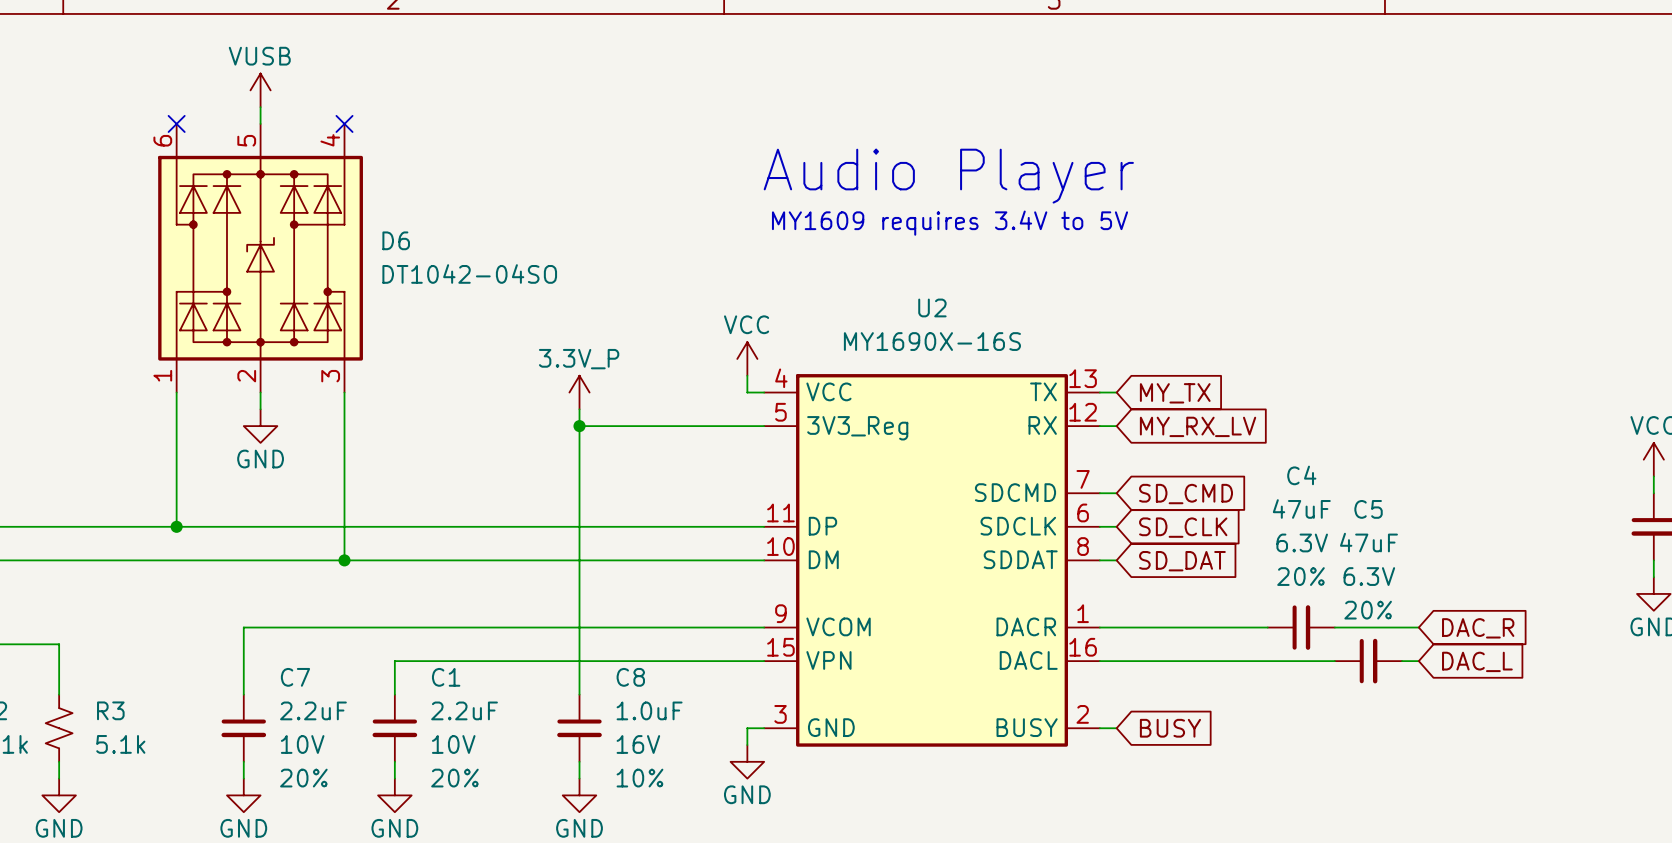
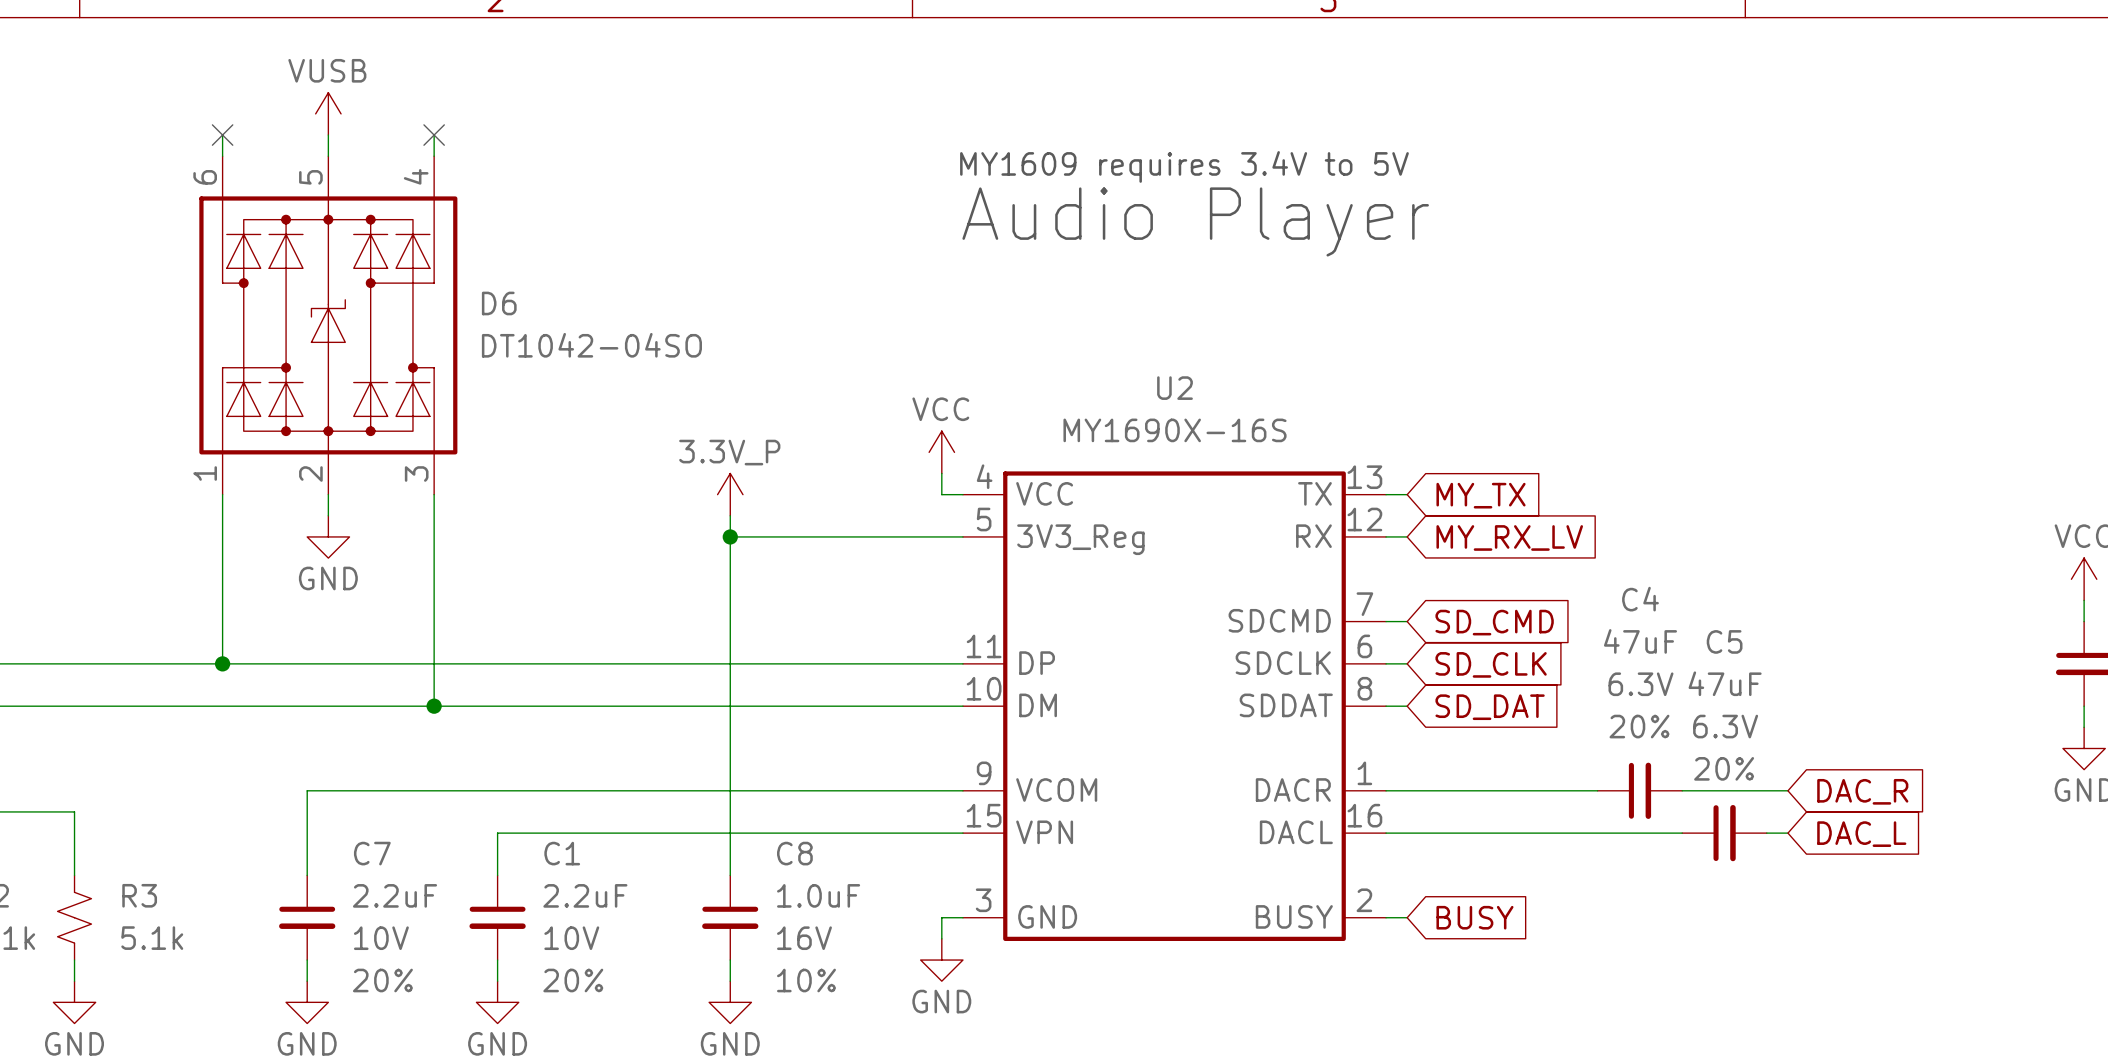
wire: none -> (222, 135) (222, 156)
wire: none -> (434, 135) (434, 156)
no-connect mark position: (176, 123) -> (222, 135)
no-connect mark position: (344, 123) -> (434, 135)
text position: MY1609 requires 3.4V to 5V (950, 223) -> MY1609 requires 3.4V to 5V (1184, 166)

